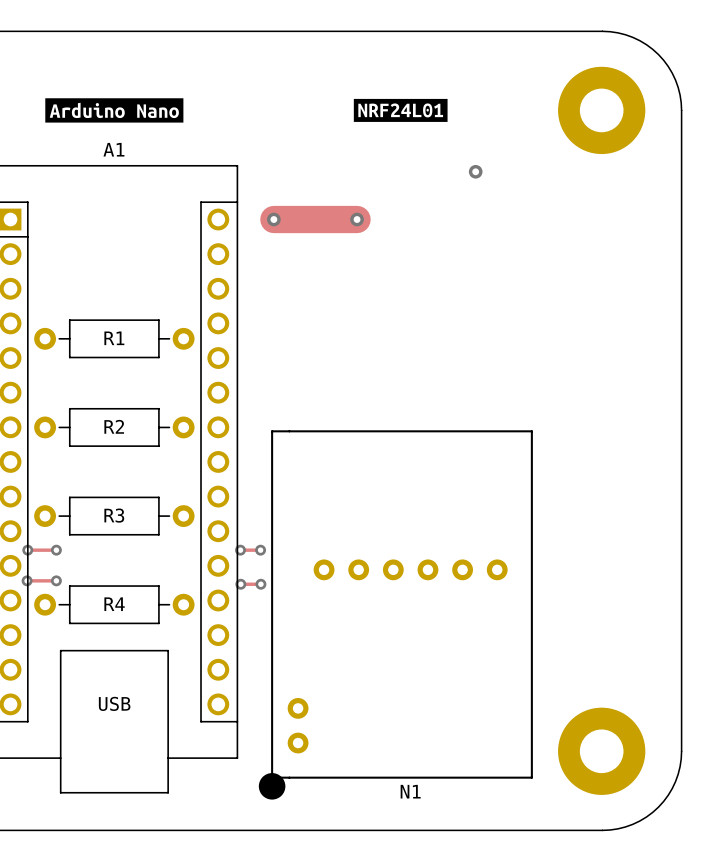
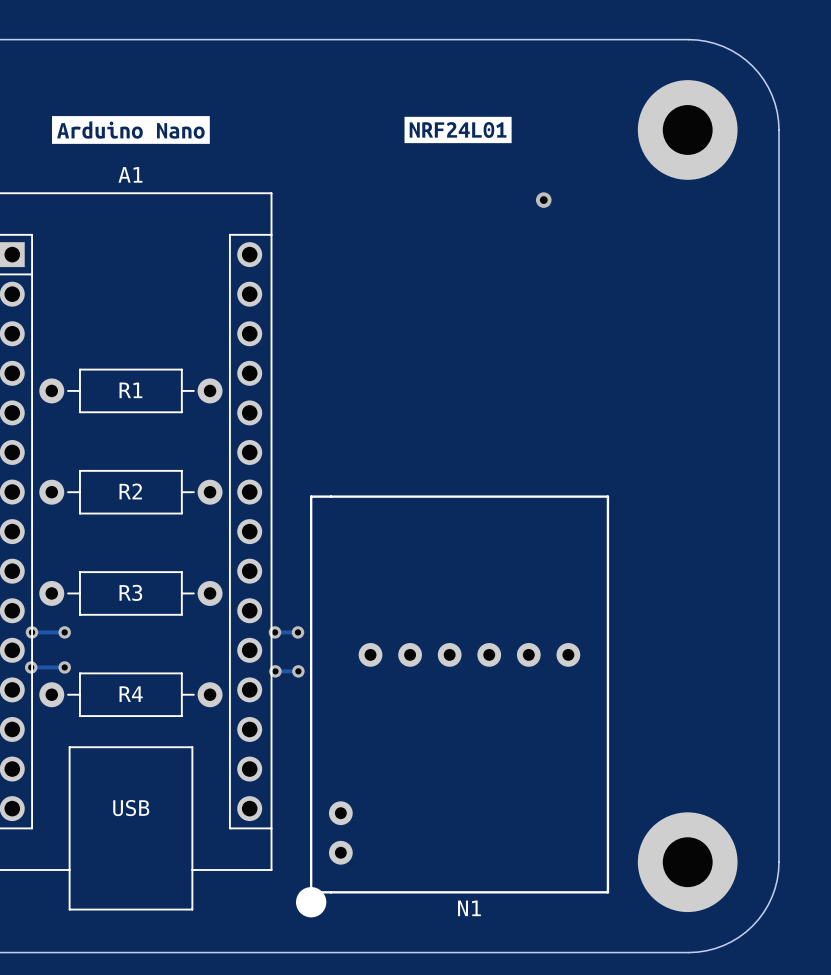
track: (273, 219) (357, 219) -> none
via: (273, 219) -> none
via: (357, 219) -> none

